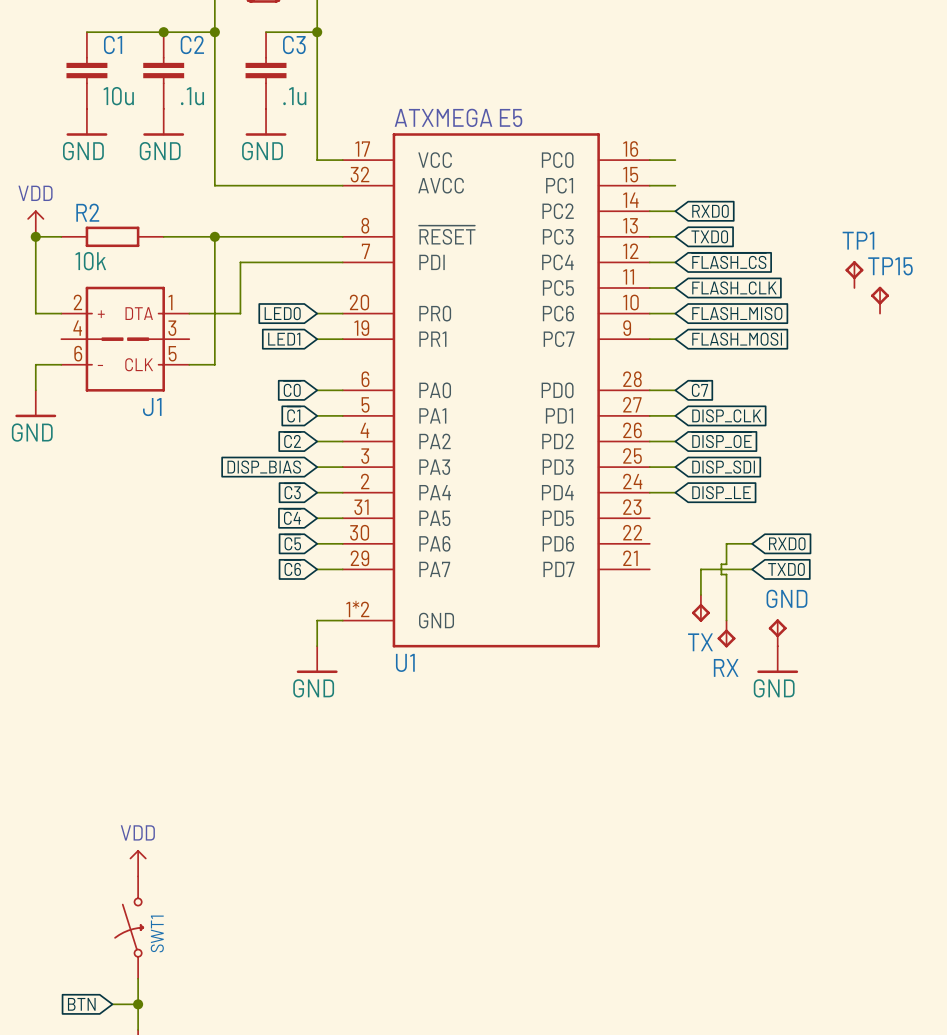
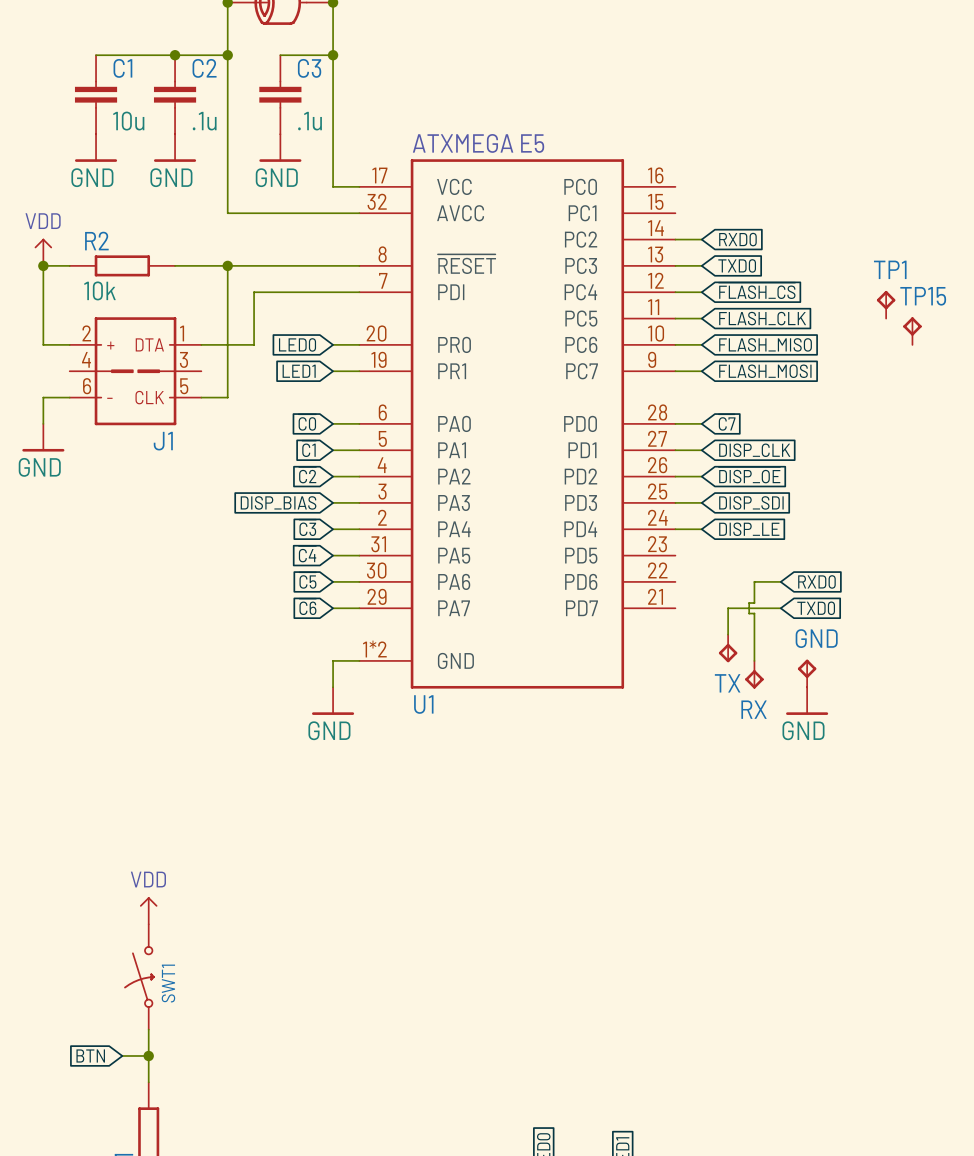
wire: (649, 160) (675, 160) -> none
wire: (649, 185) (675, 185) -> none

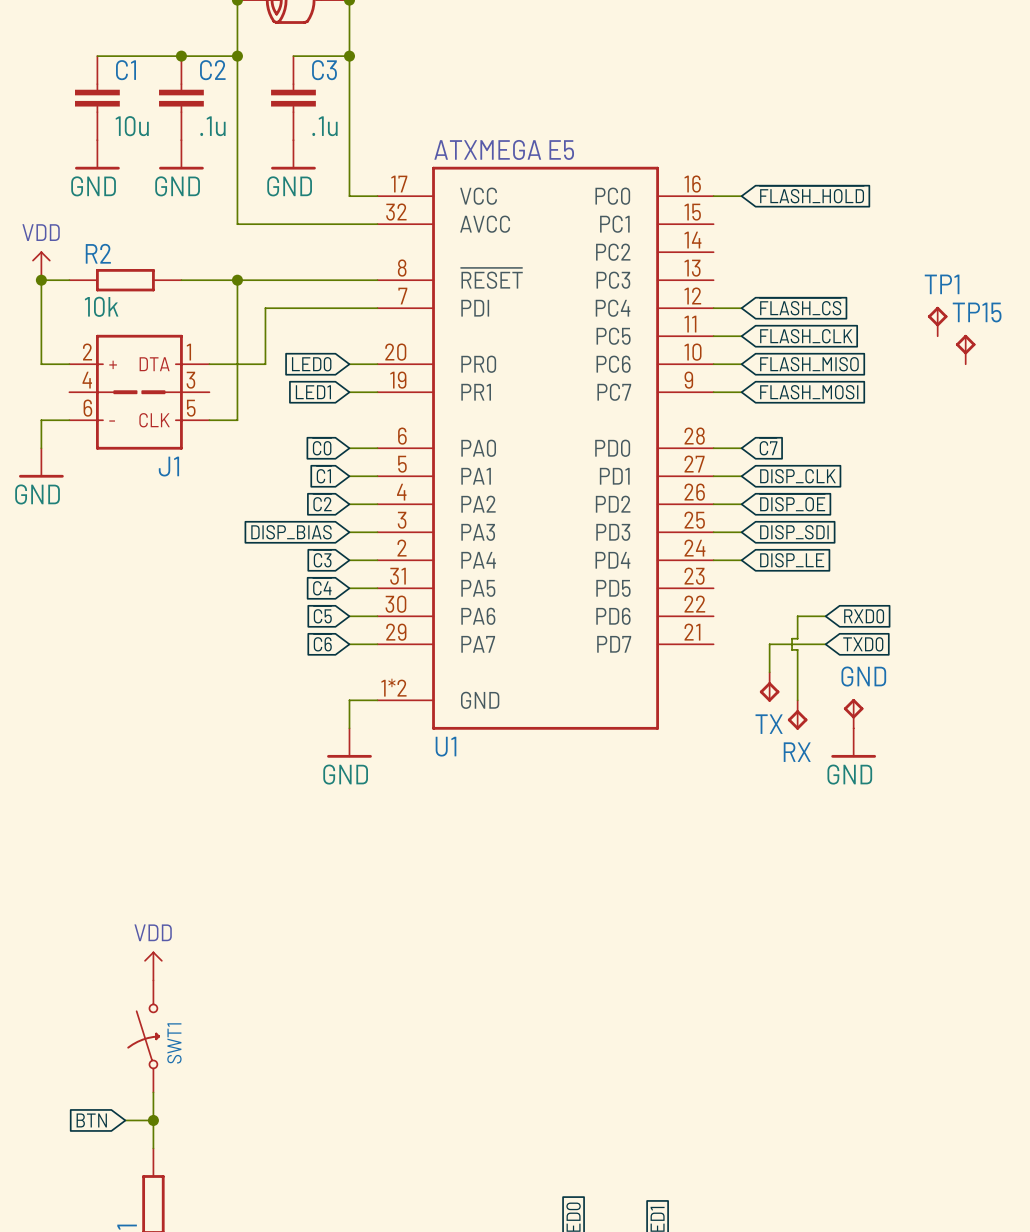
global label: none -> ~{FLASH_HOLD} (811, 194)
wire: (675, 239) (701, 239) -> (713, 196) (741, 196)
global label: RXD0 (737, 239) -> none
wire: (675, 265) (701, 265) -> none
global label: TXD0 (737, 265) -> none

